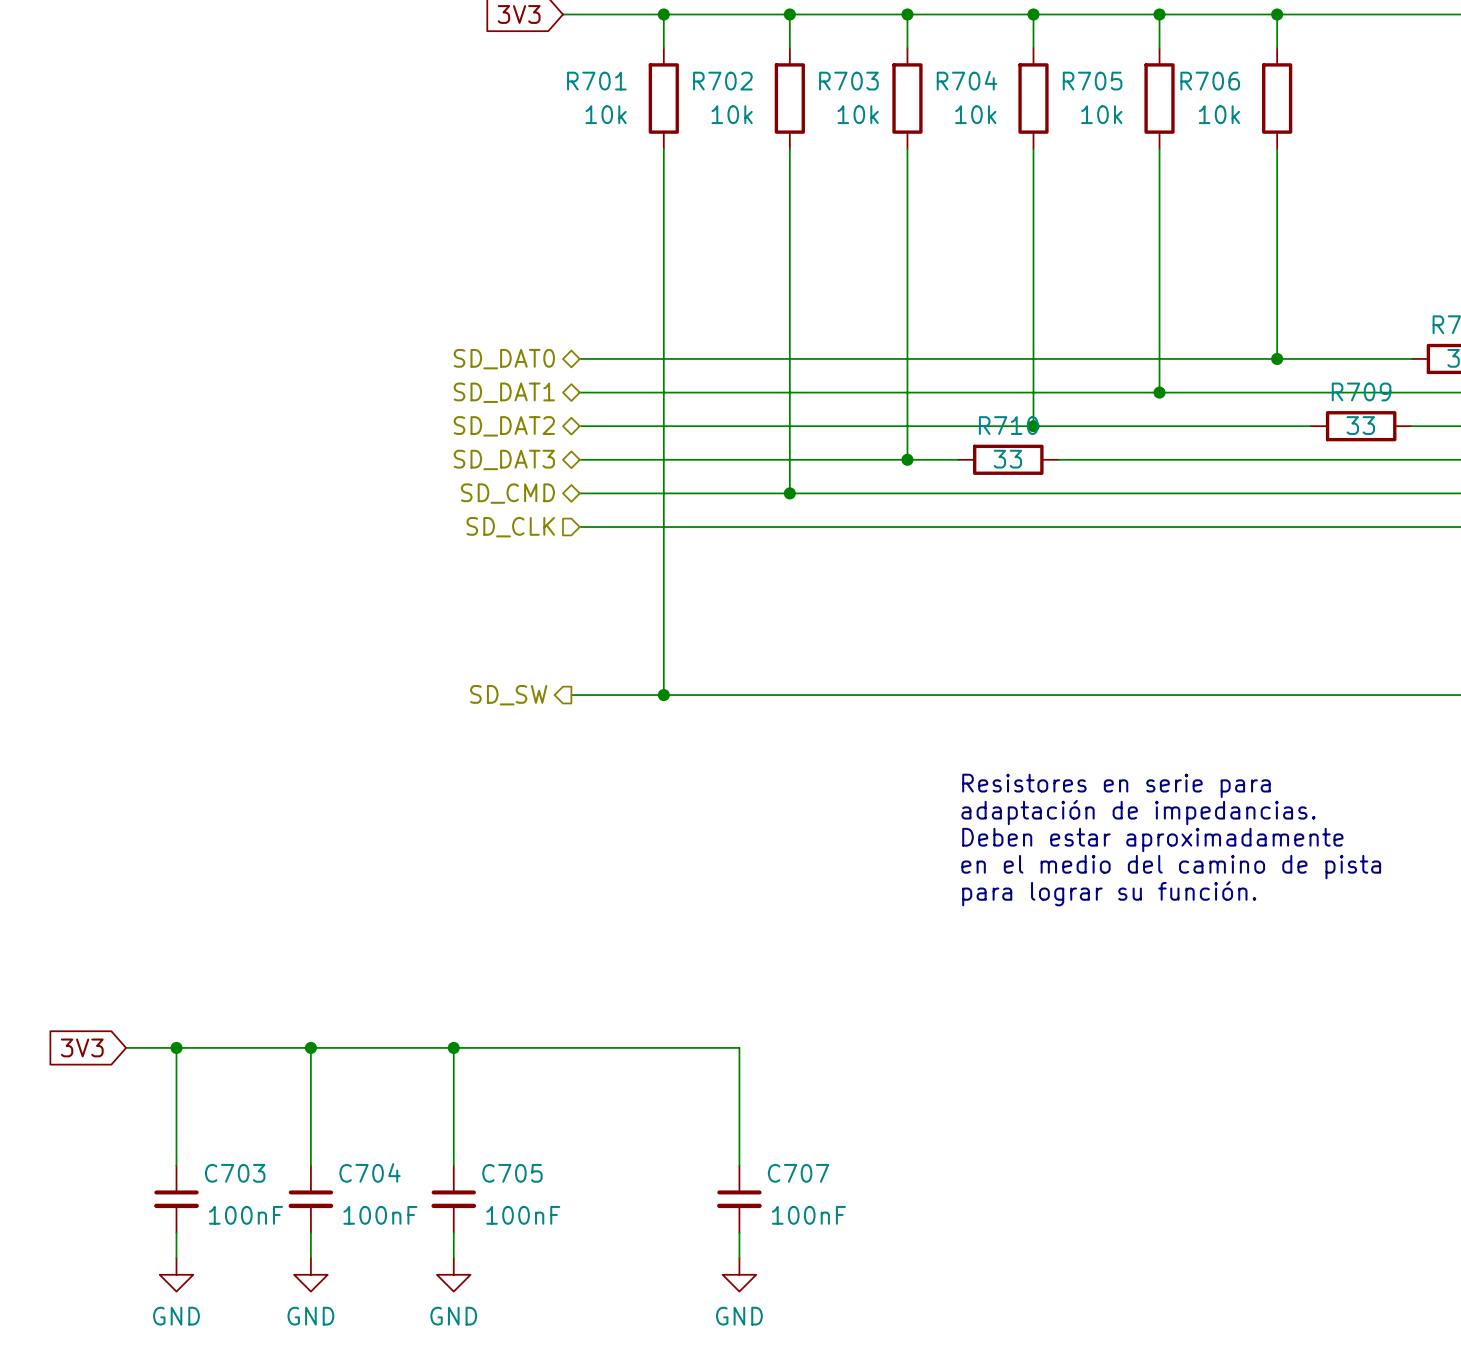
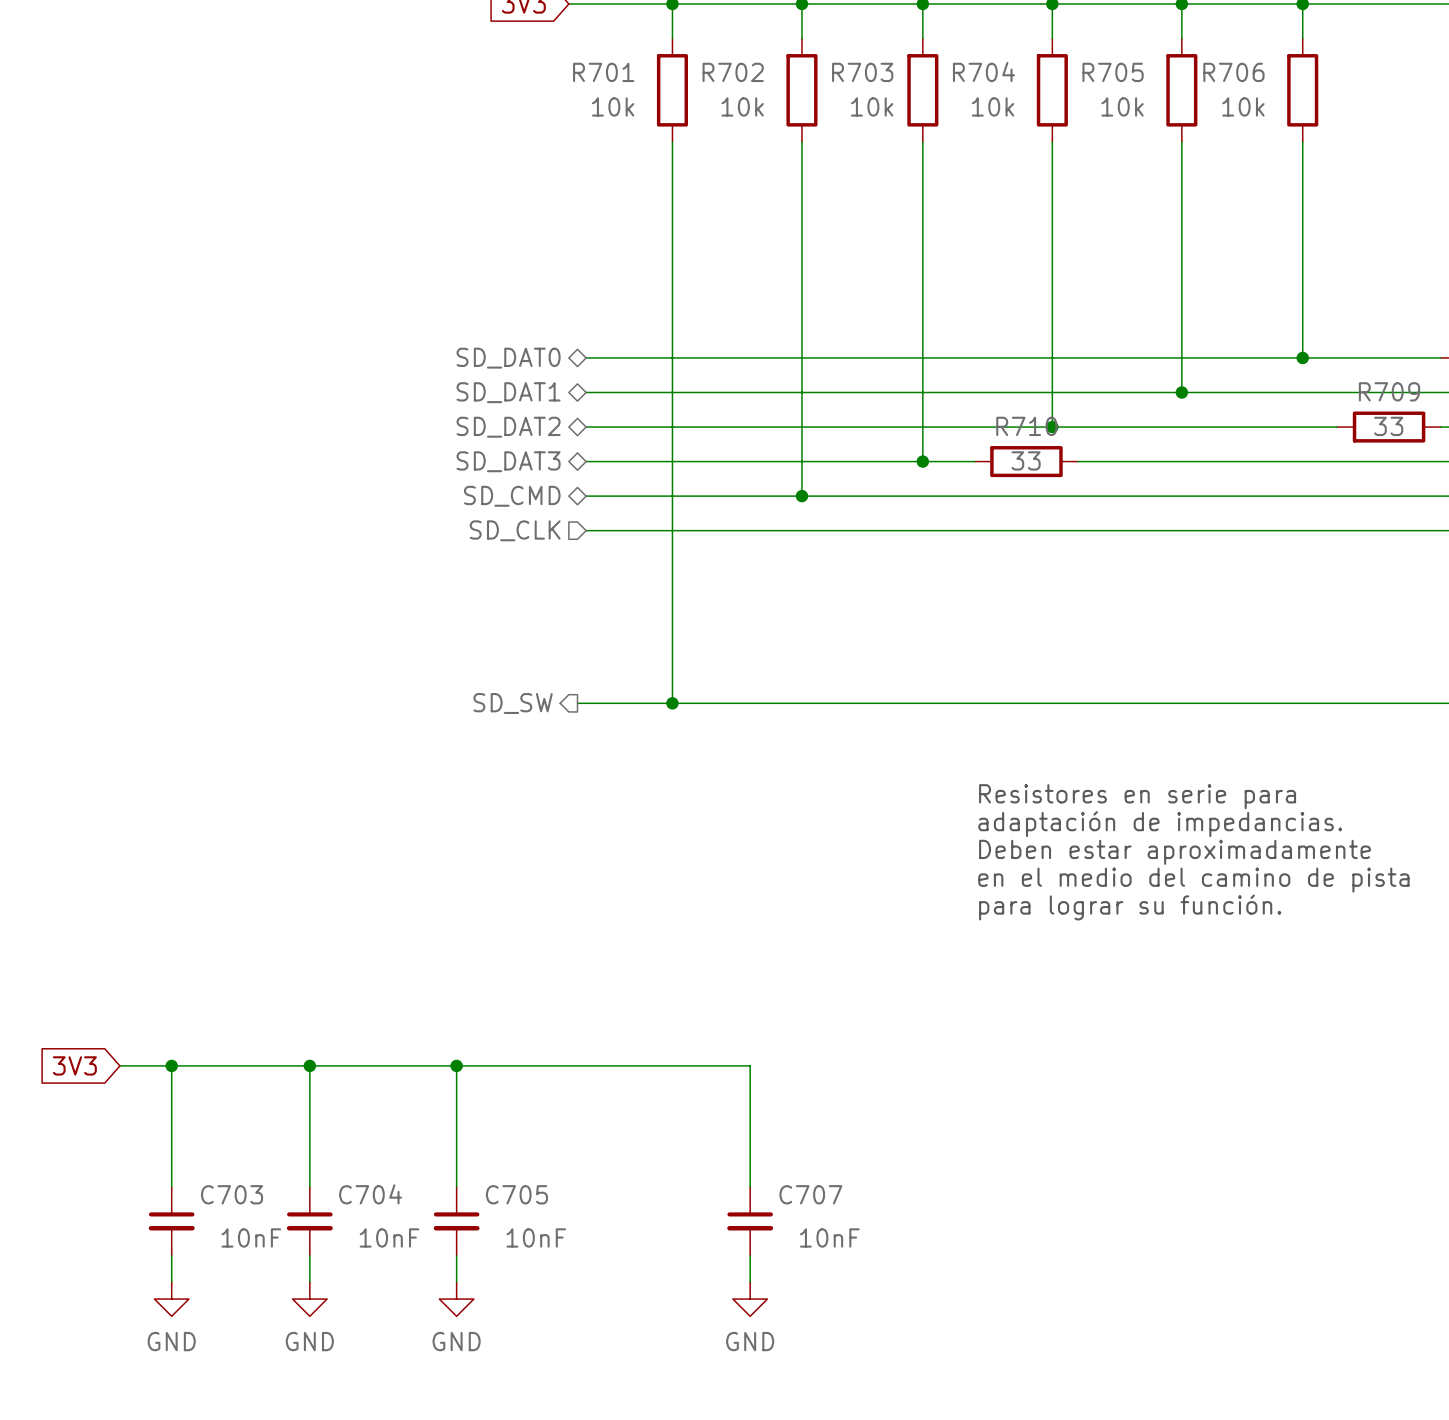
C703 value: 100nF (245, 1215) -> 10nF (251, 1237)
C704 value: 100nF (380, 1215) -> 10nF (389, 1237)
C705 value: 100nF (523, 1215) -> 10nF (536, 1237)
C707 value: 100nF (808, 1215) -> 10nF (829, 1237)

